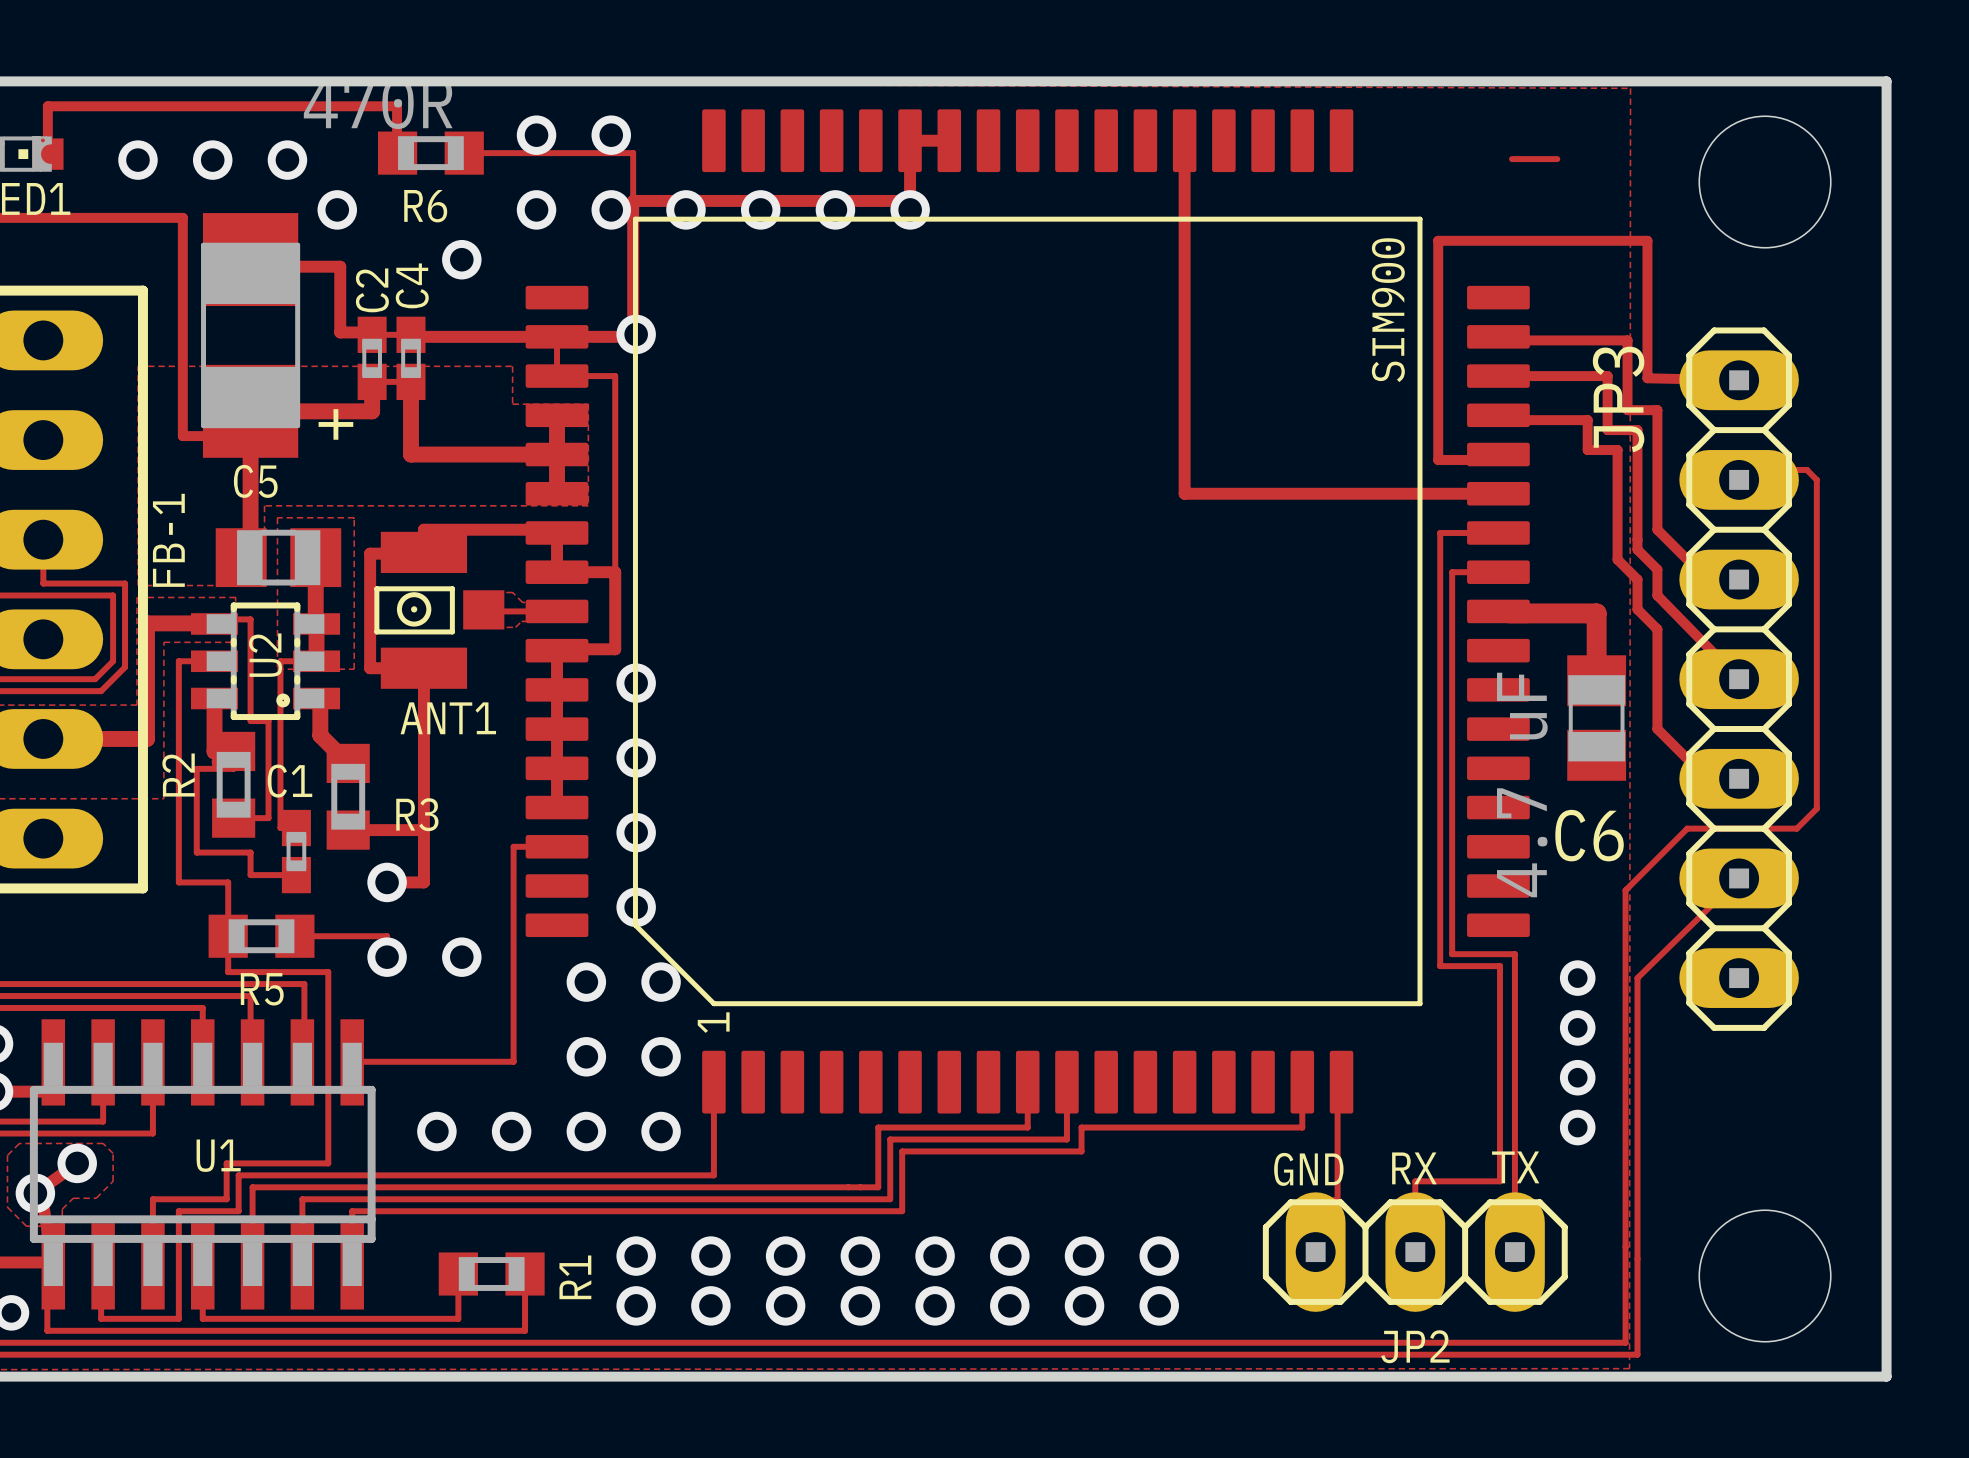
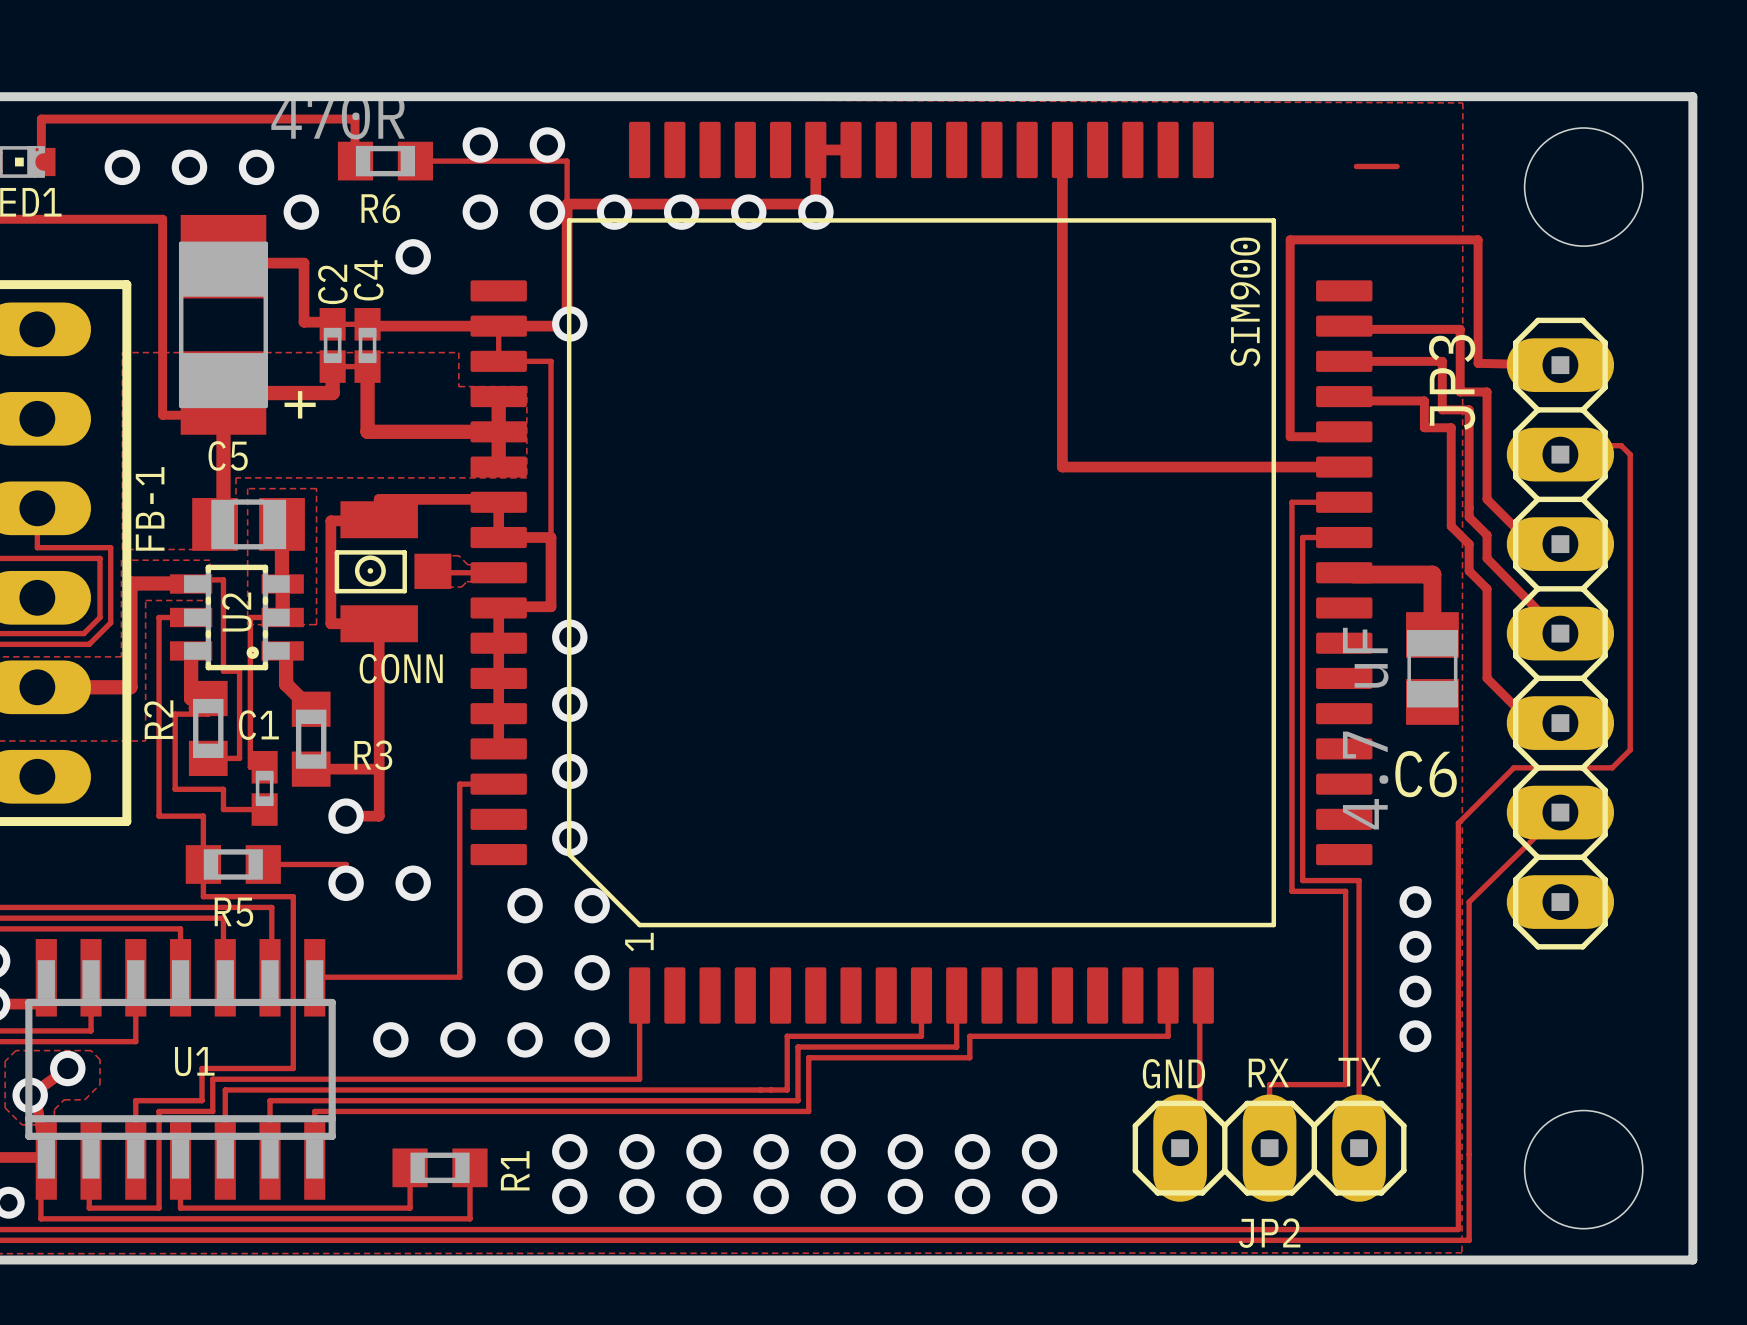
ANT1 name: ANT1 (448, 718) -> CONN (401, 668)

